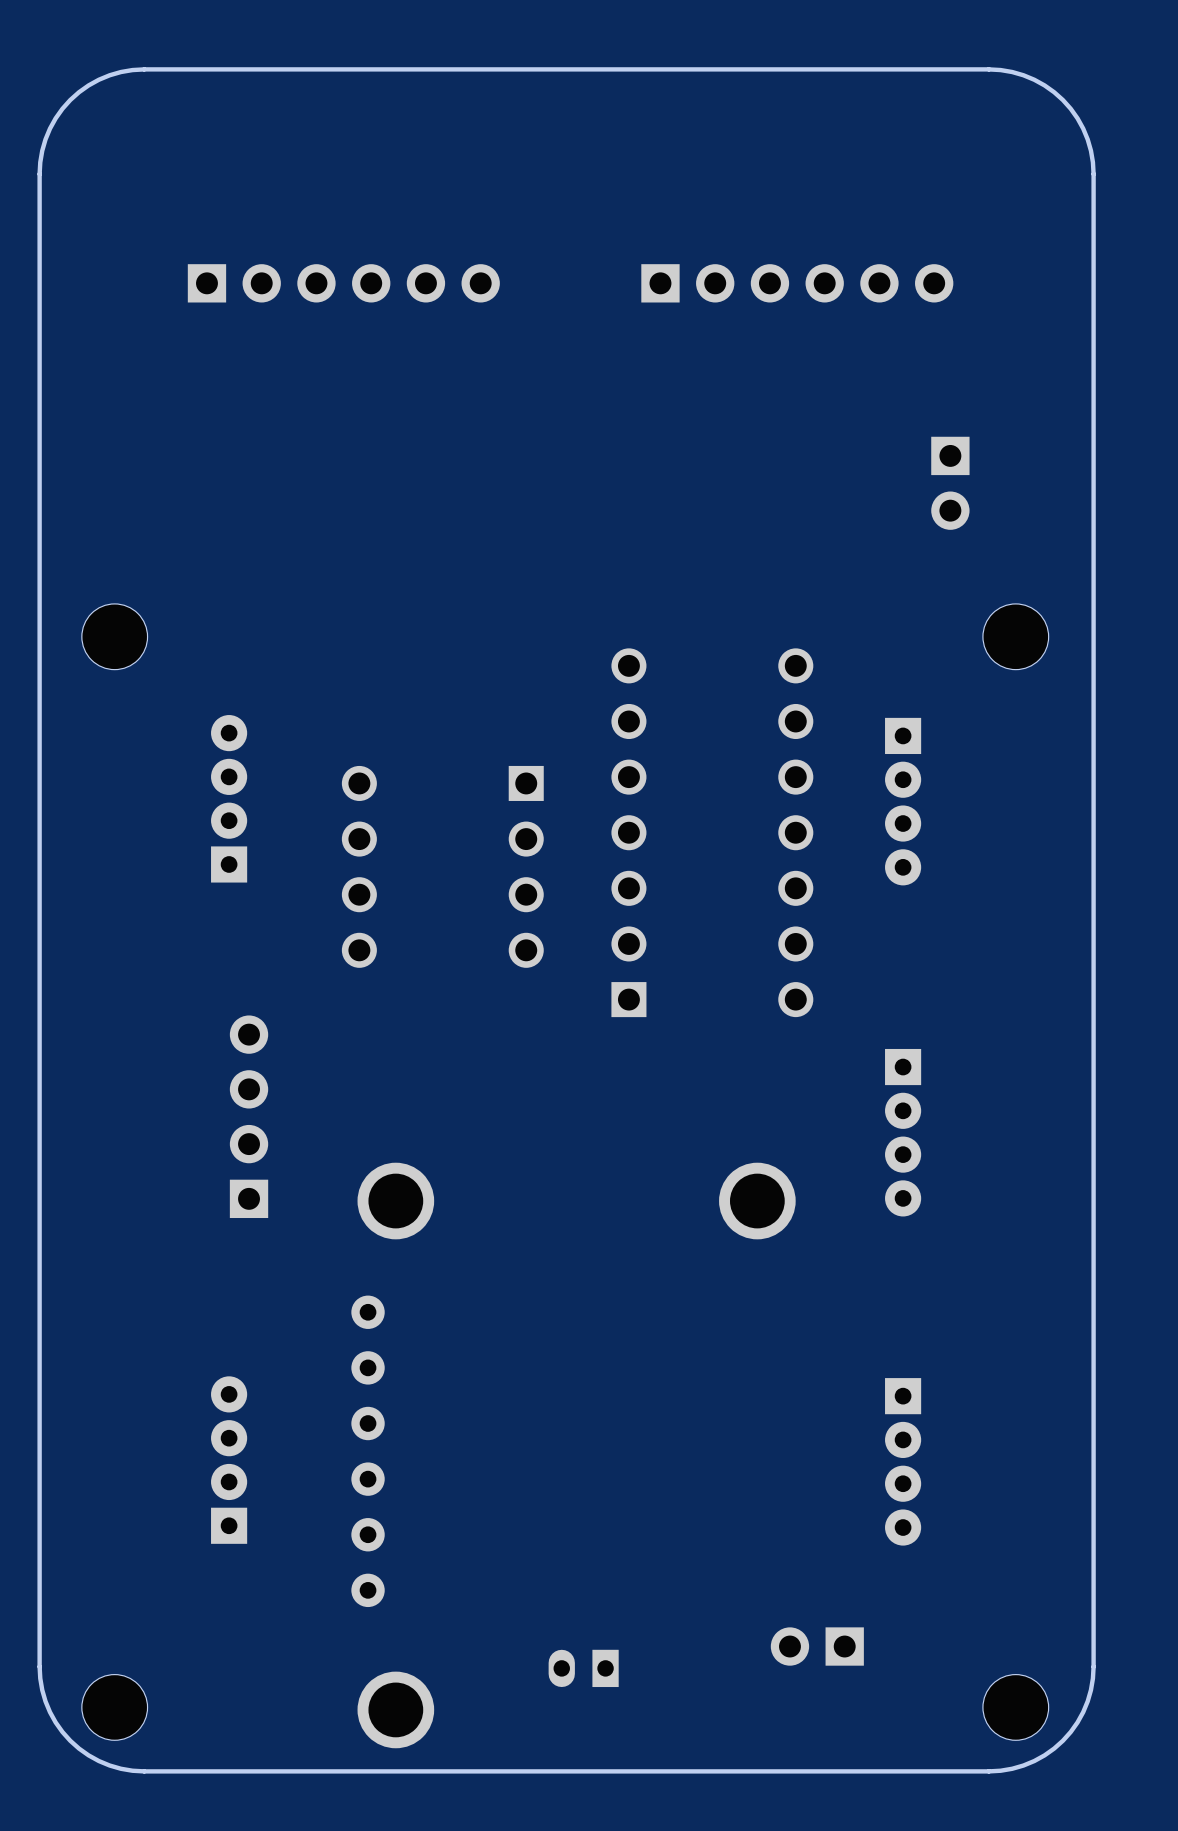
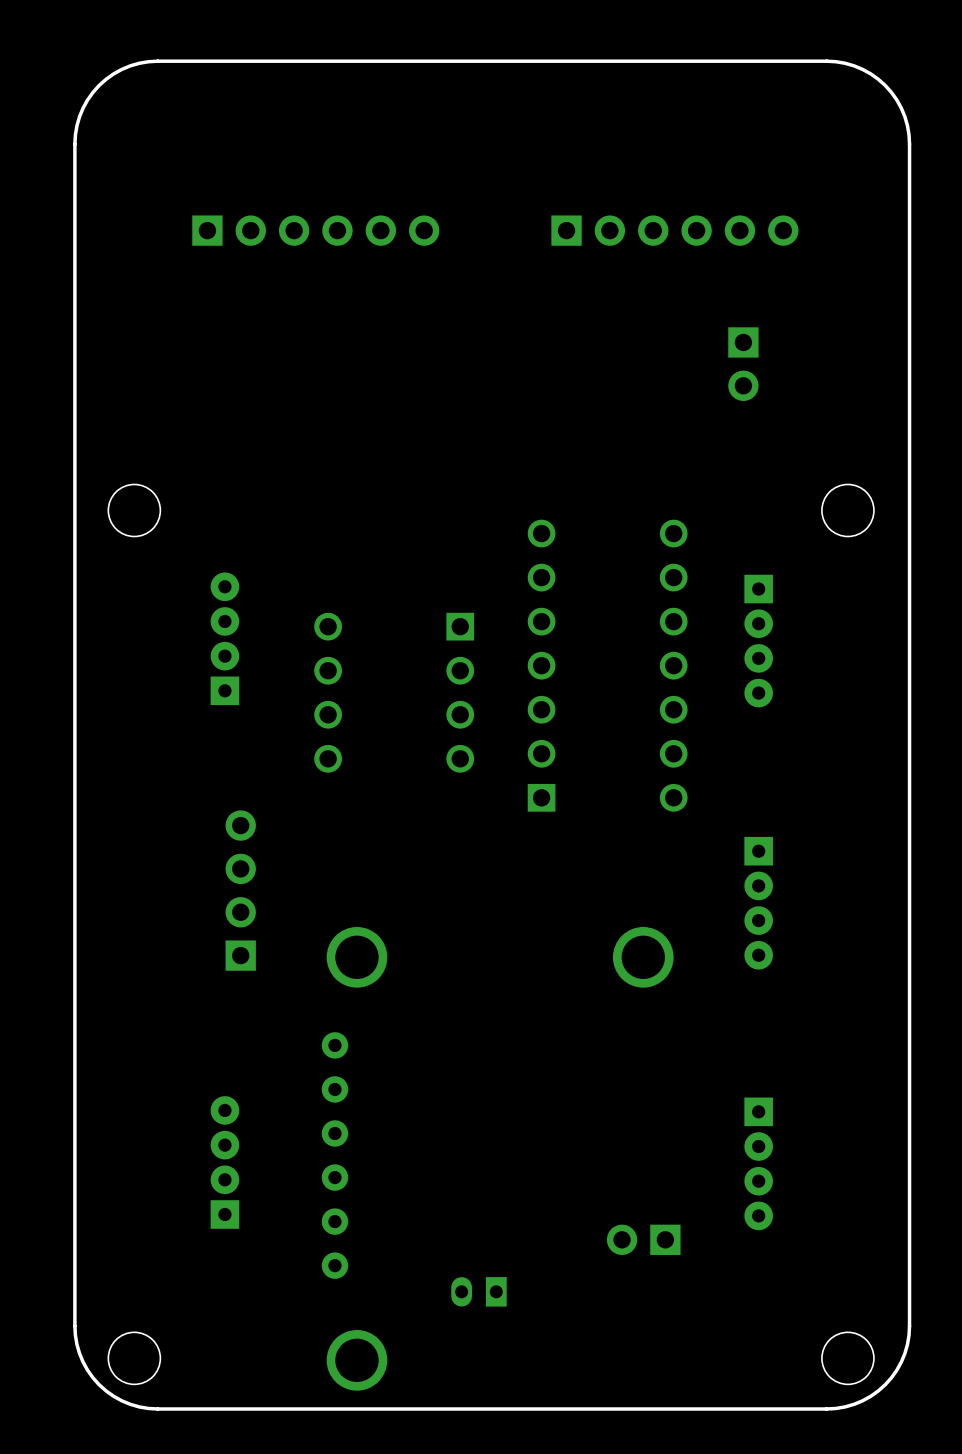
part position: (950, 483) -> (743, 364)
part position: (817, 1646) -> (643, 1239)
part position: (583, 1668) -> (478, 1291)

